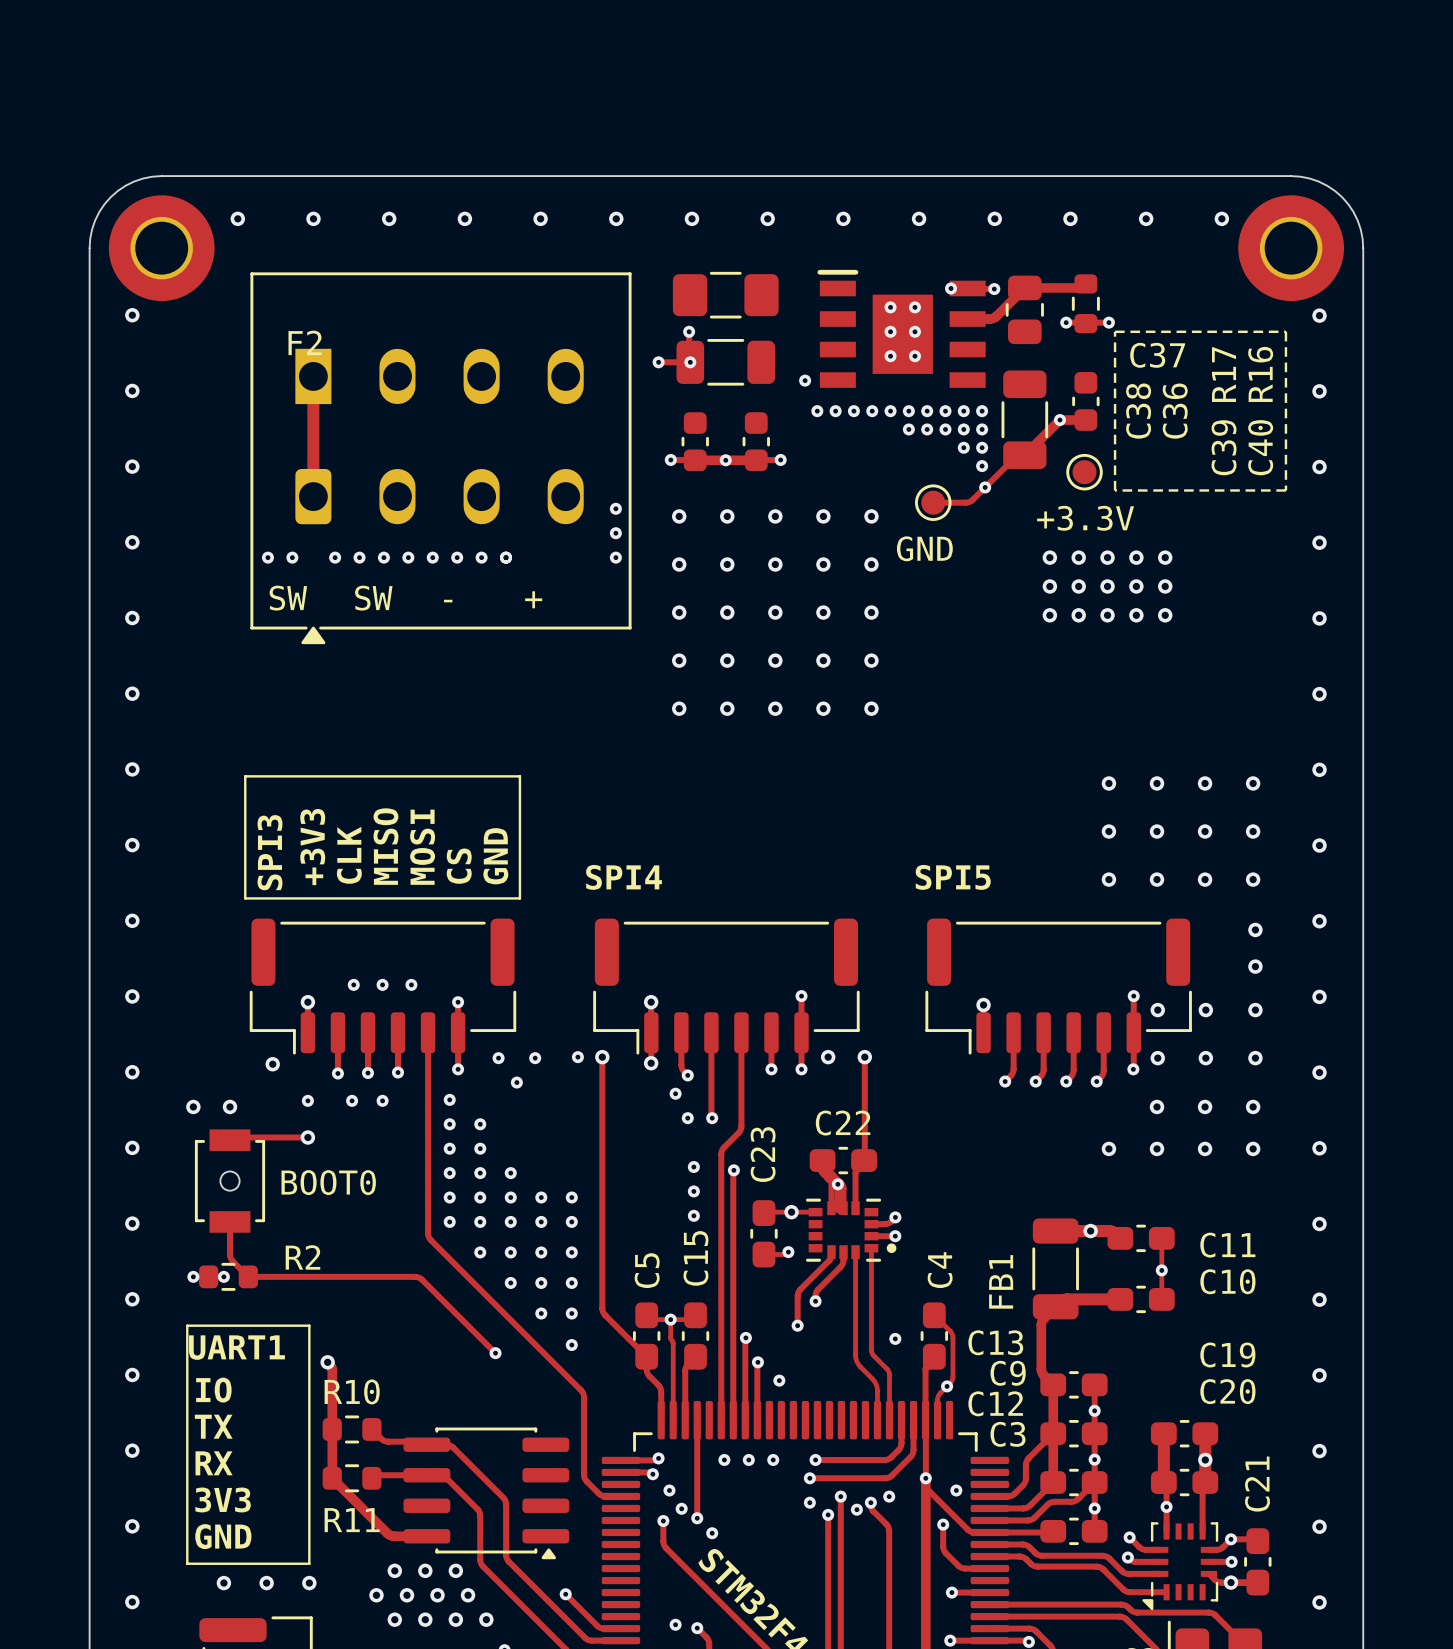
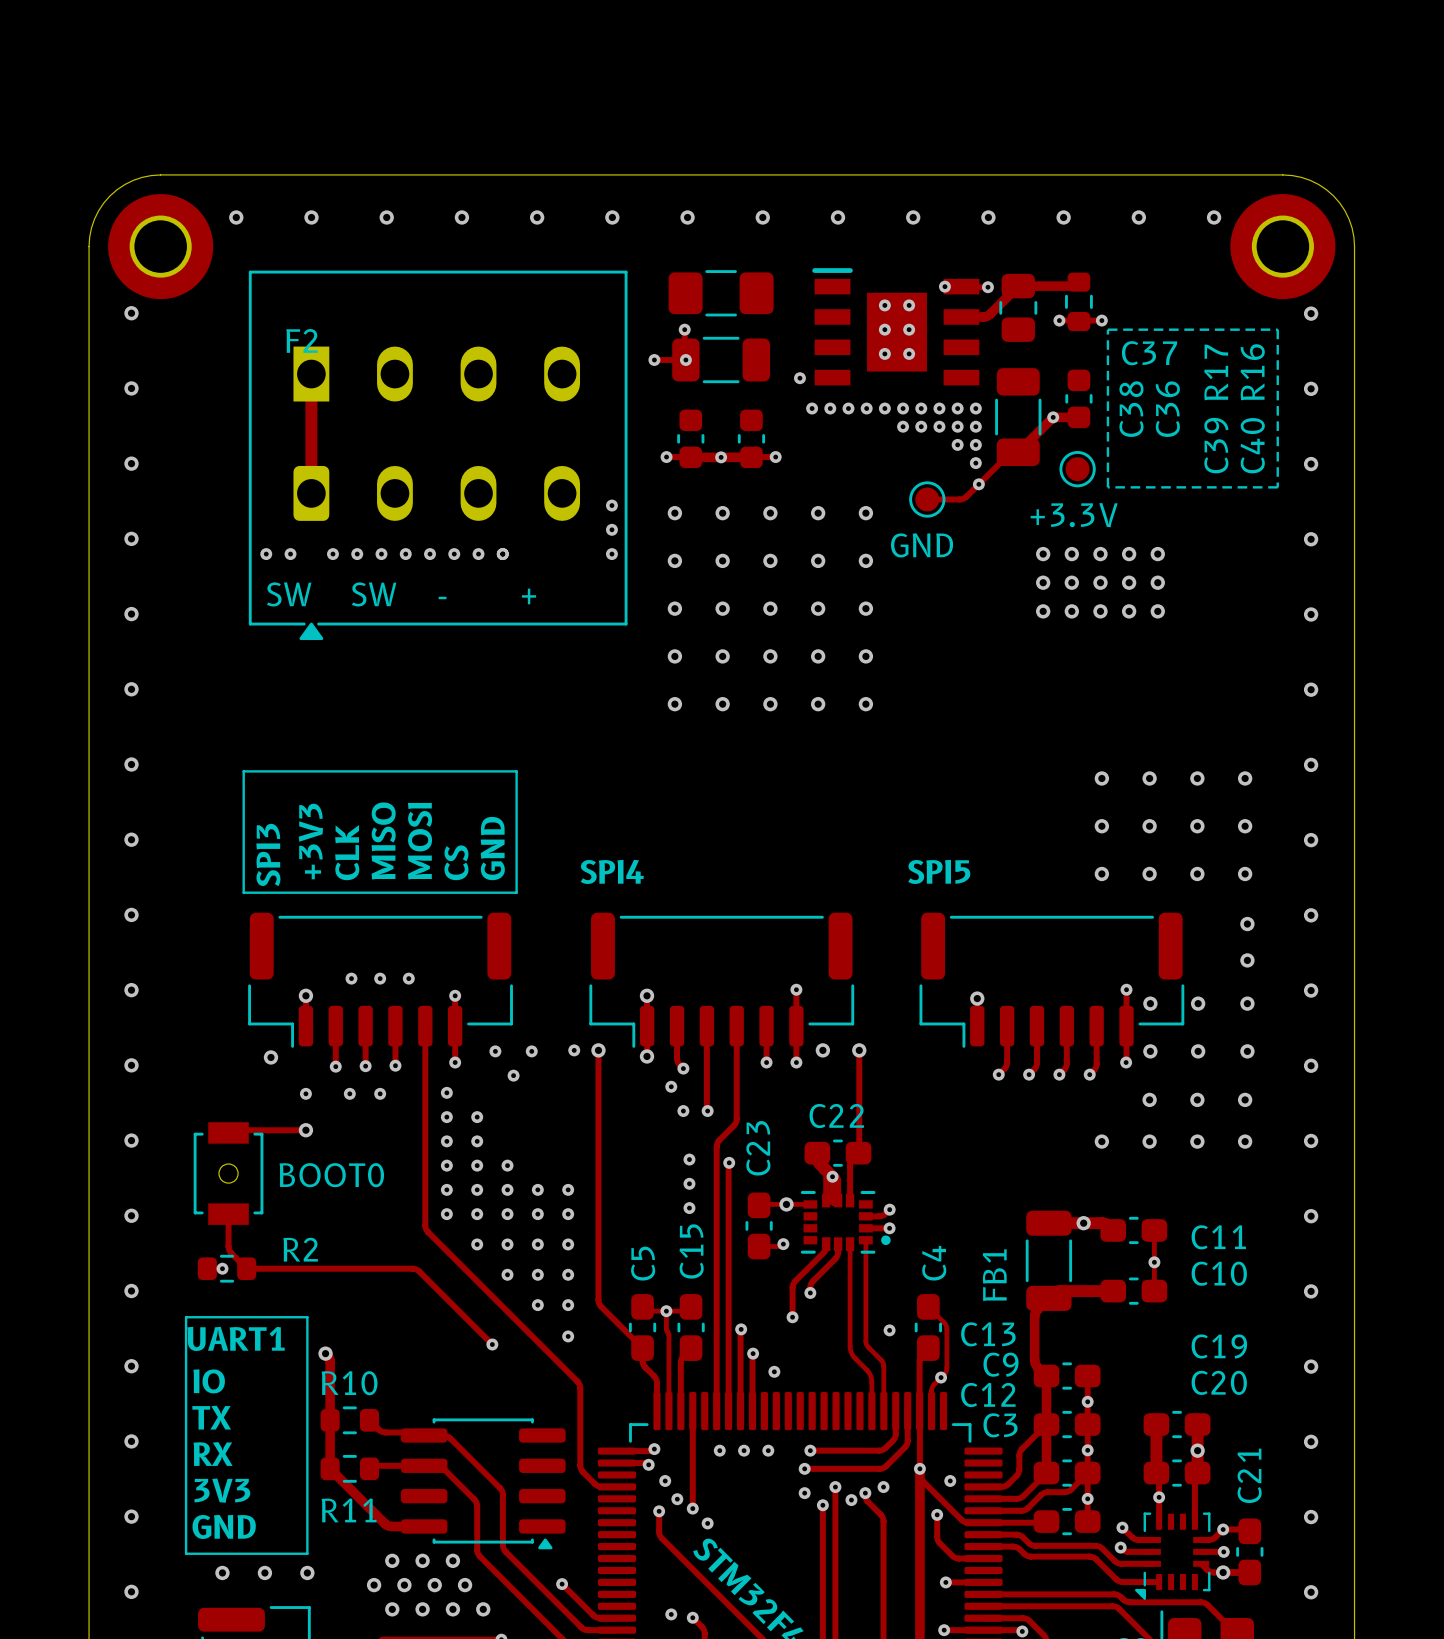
via: (193, 1106) -> none
via: (230, 1106) -> none
via: (193, 1276) -> none

